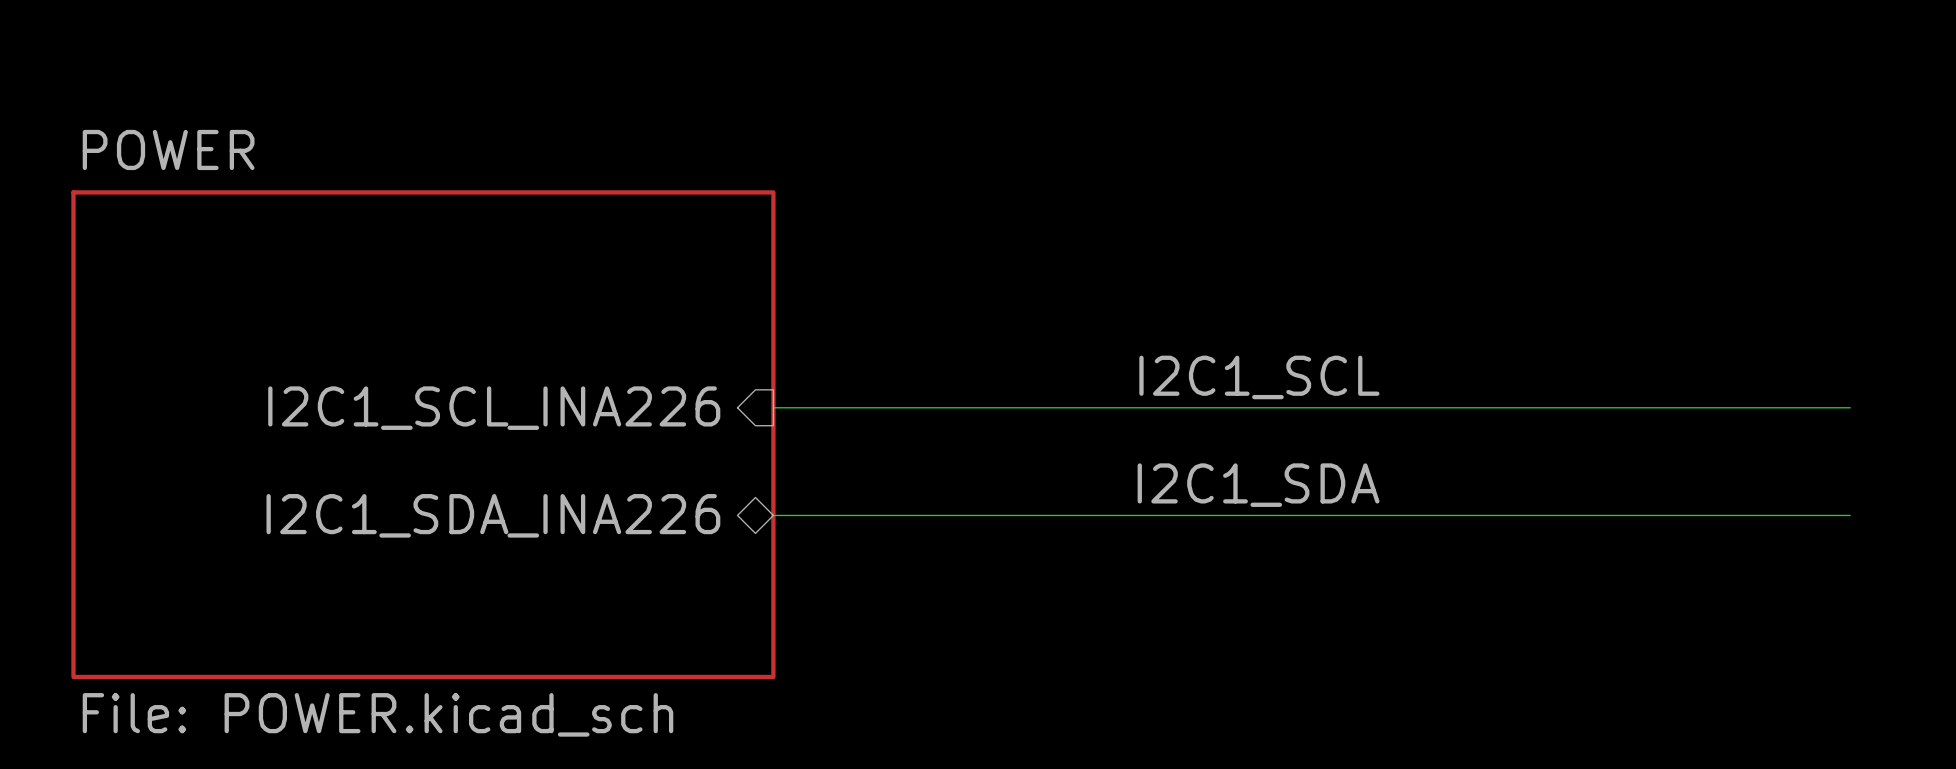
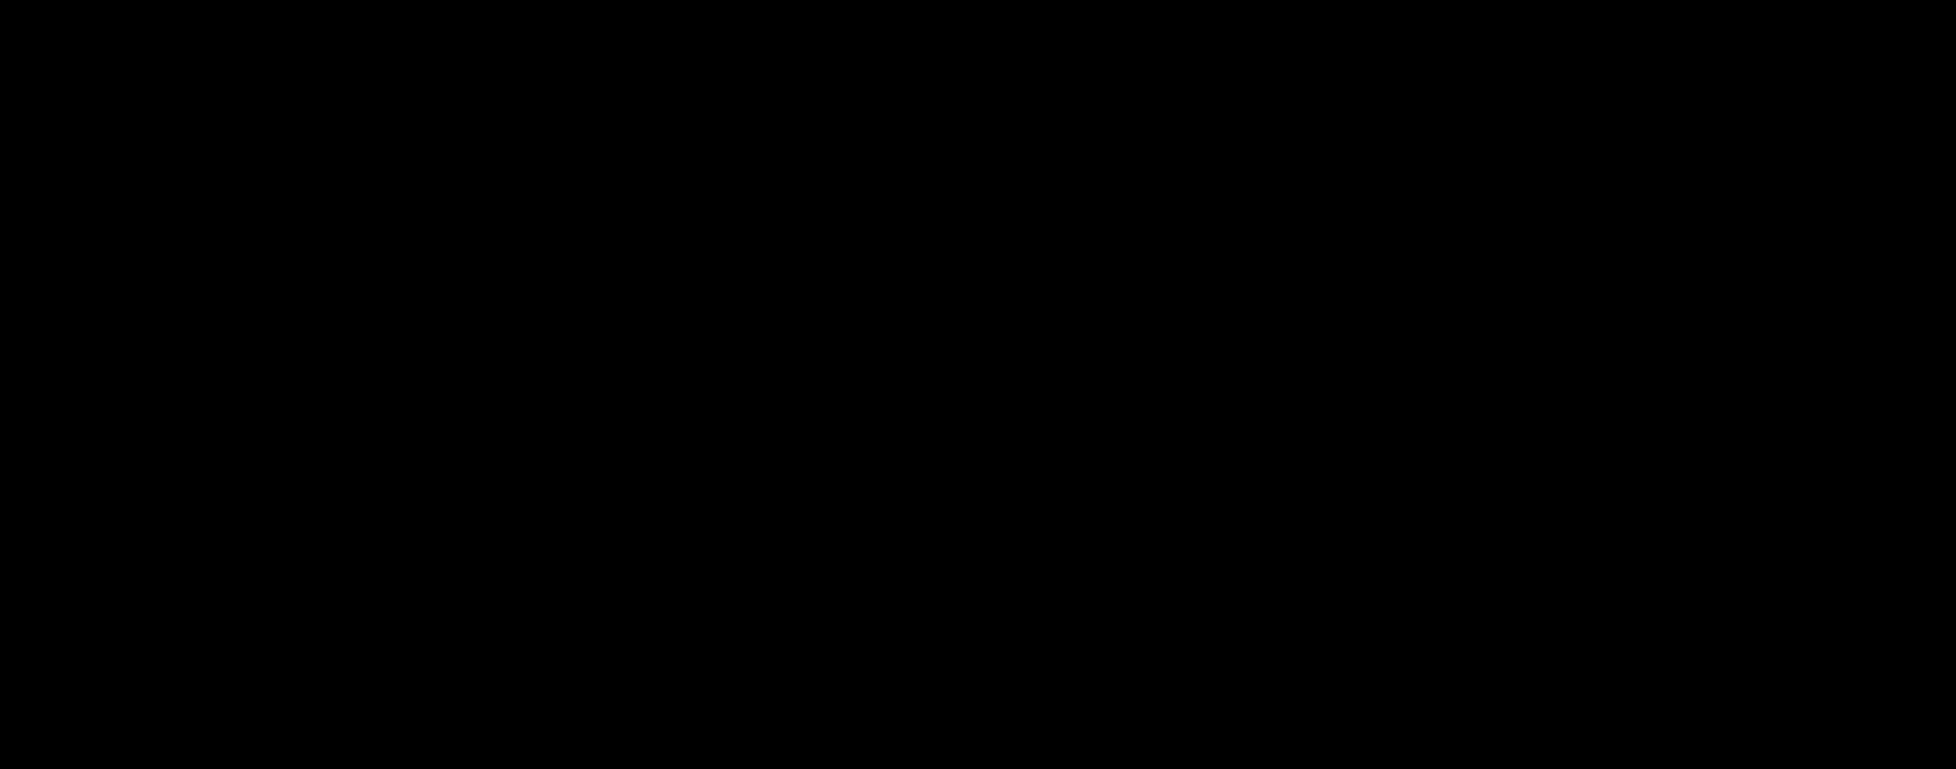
label: I2C1_SCL (1259, 377) -> none
wire: (773, 407) (1850, 407) -> none
sheet pin: I2C1_SCL_INA226 (494, 408) -> none
sheet POWER: File: POWER.kicad_sch (423, 434) -> none
label: I2C1_SDA (1258, 485) -> none
sheet pin: I2C1_SDA_INA226 (493, 515) -> none
wire: (773, 515) (1850, 515) -> none

